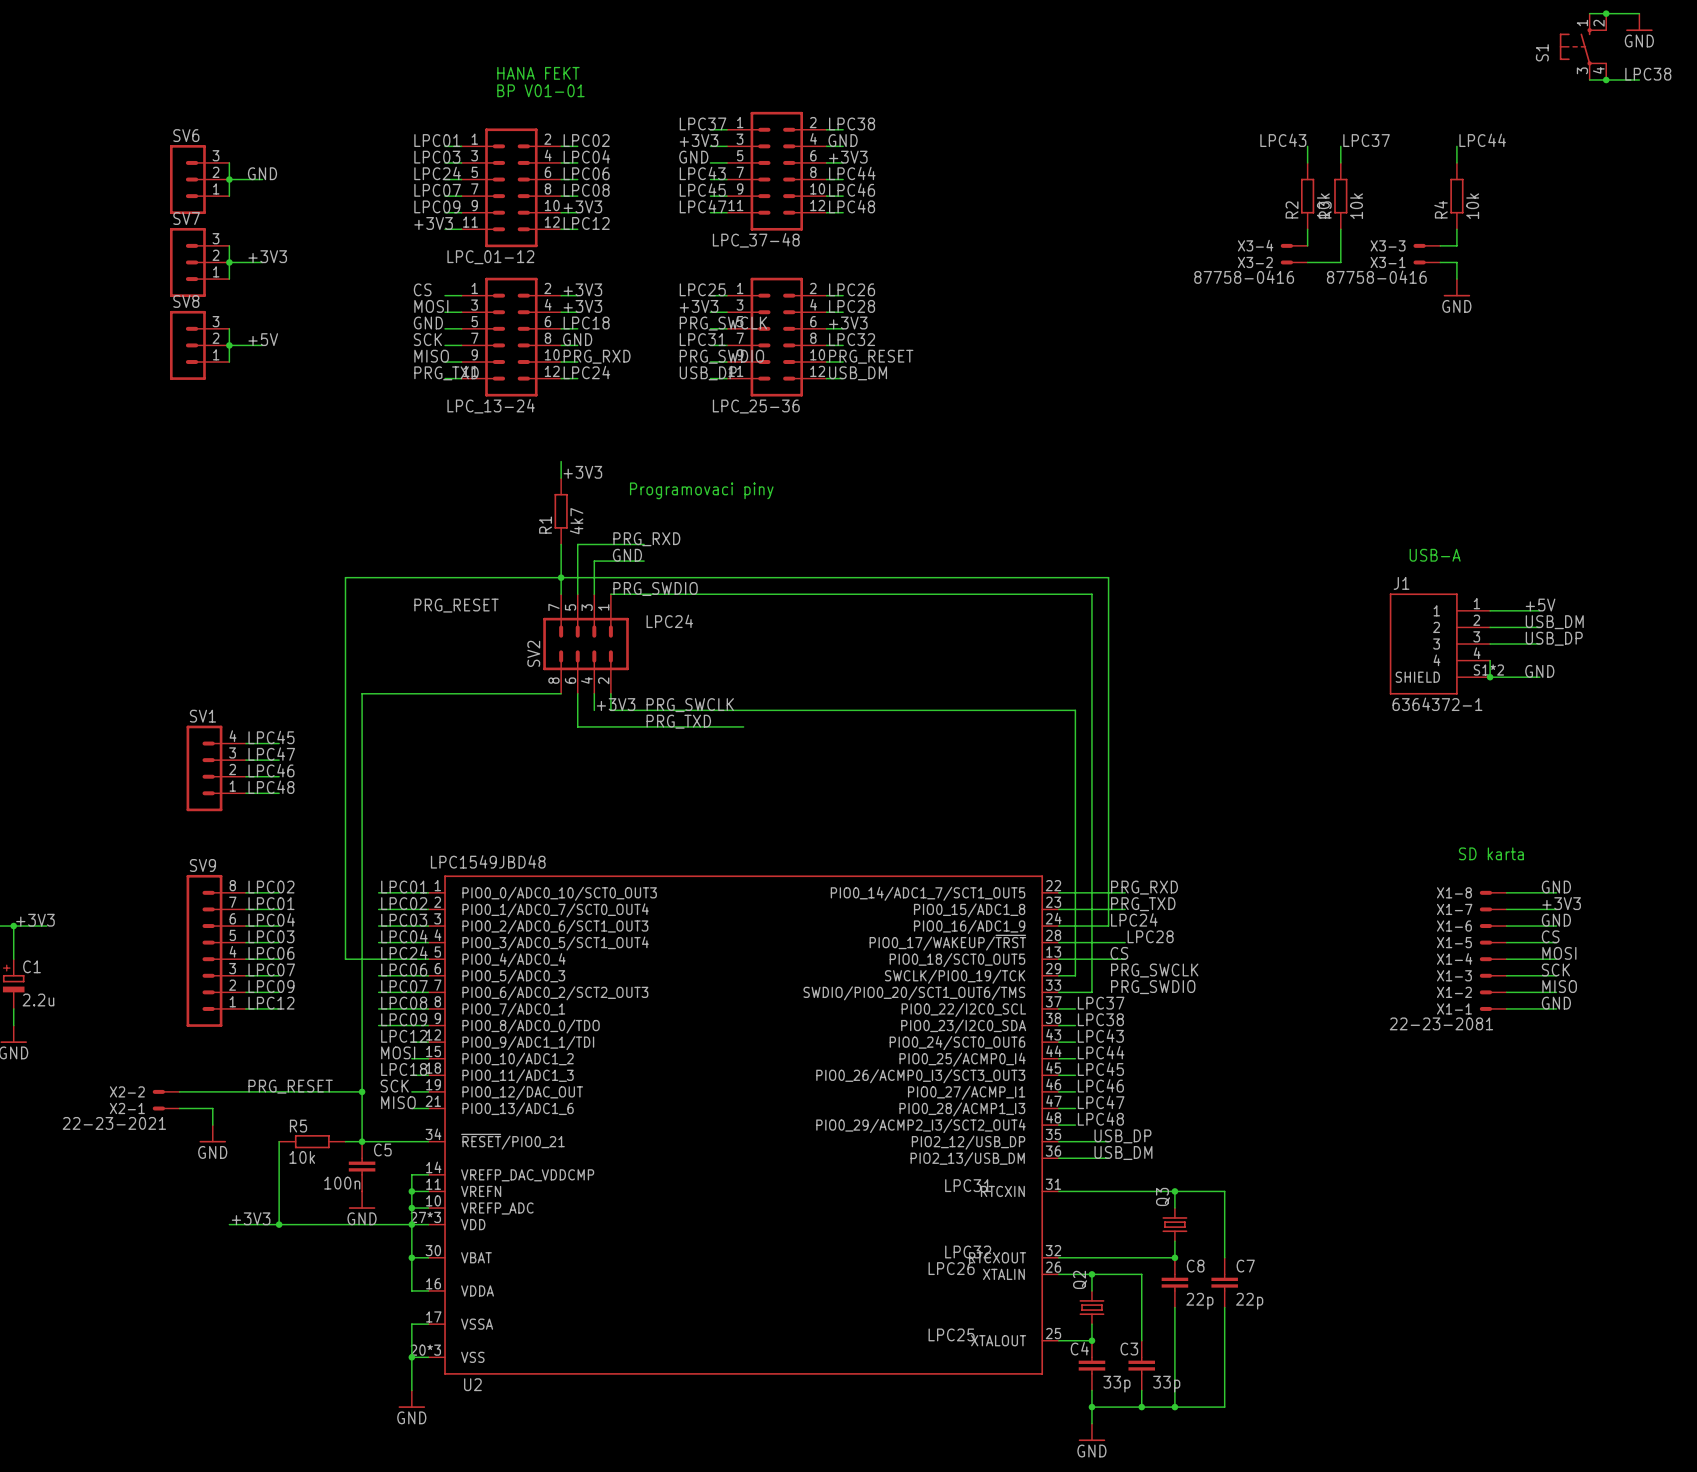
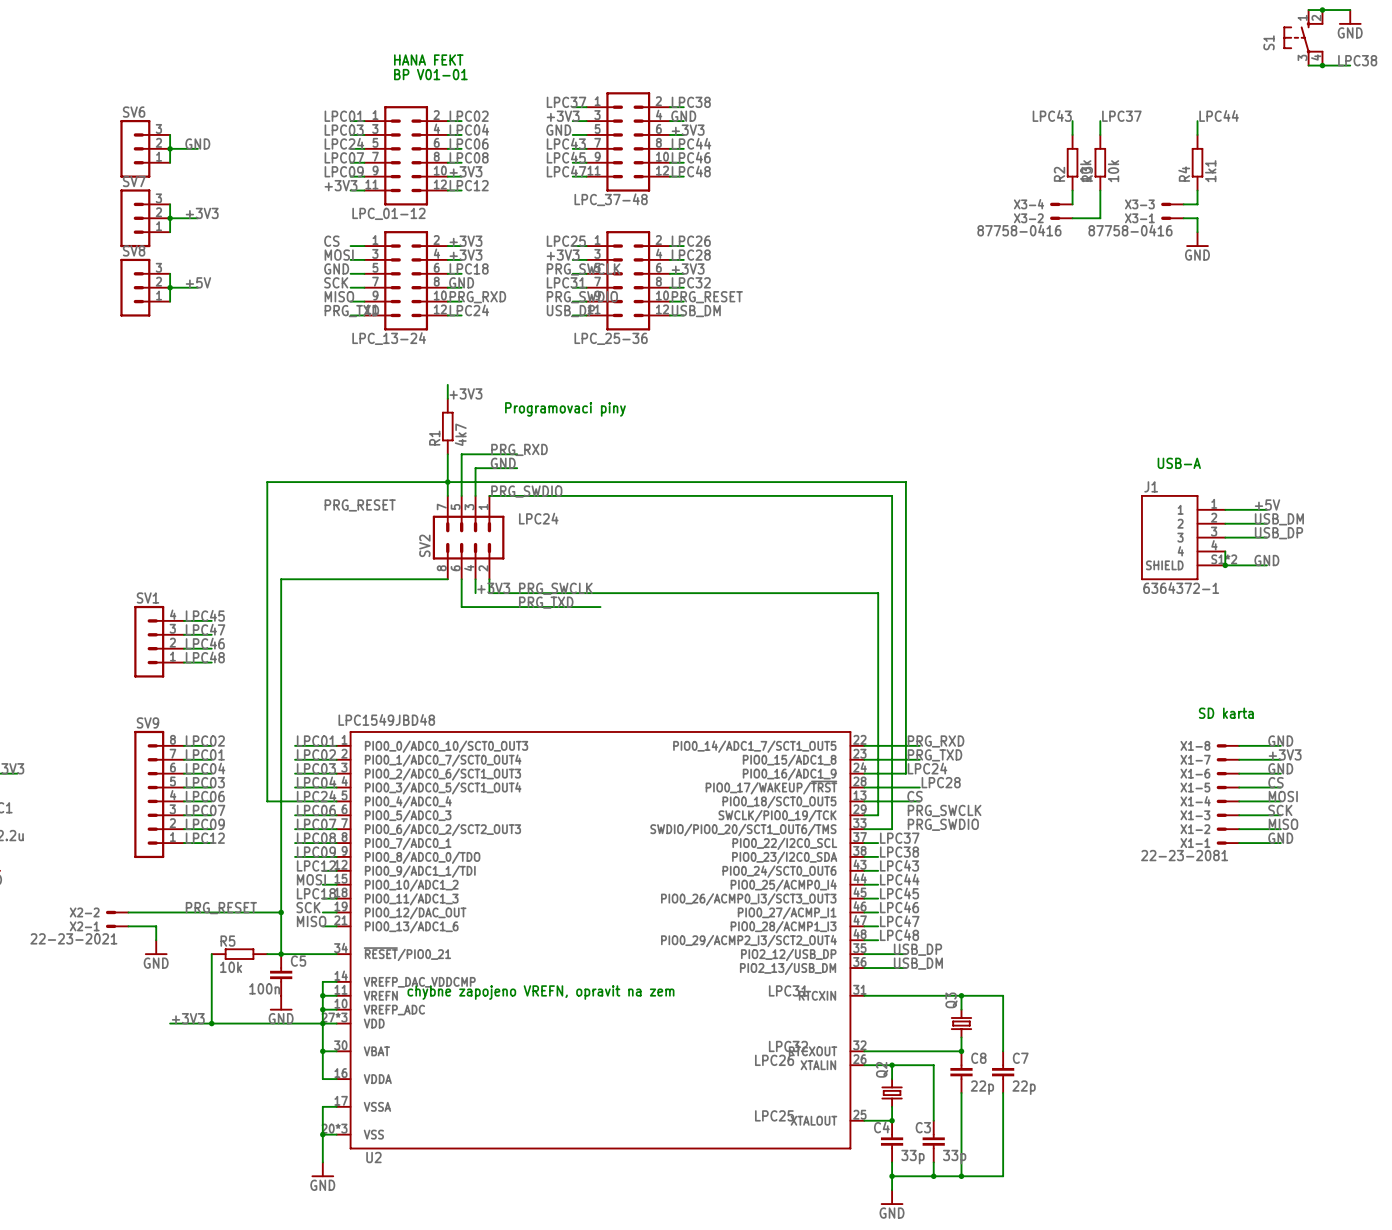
R4 value: 10k (1472, 206) -> 1k1 (1210, 171)
text: none -> chybne zapojeno VREFN, opravit na zem (540, 992)

